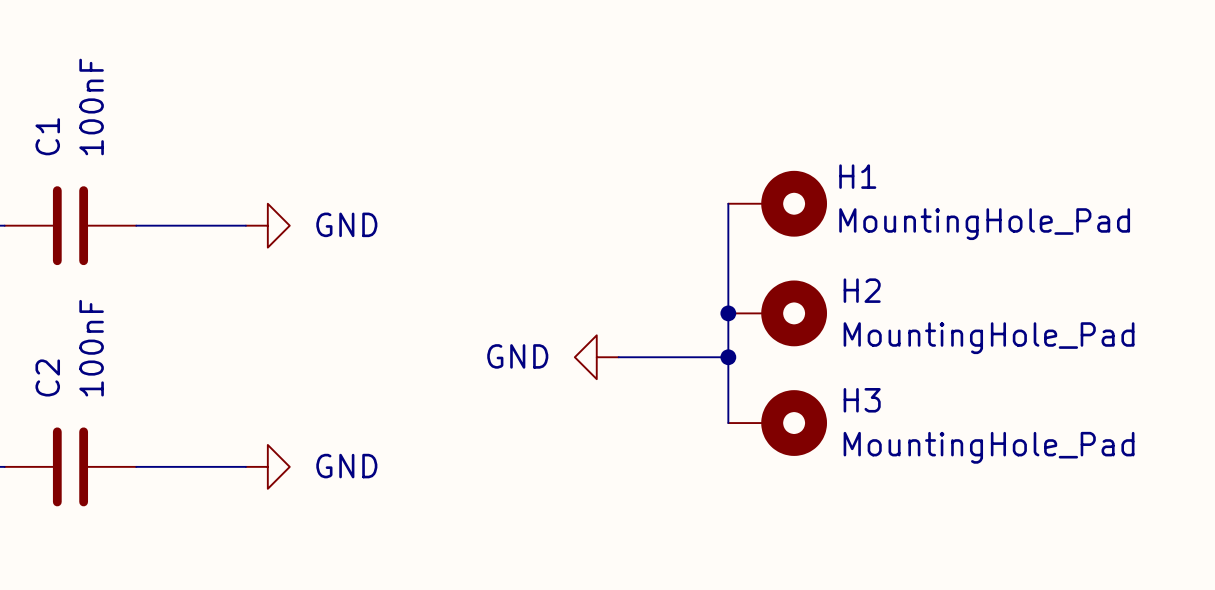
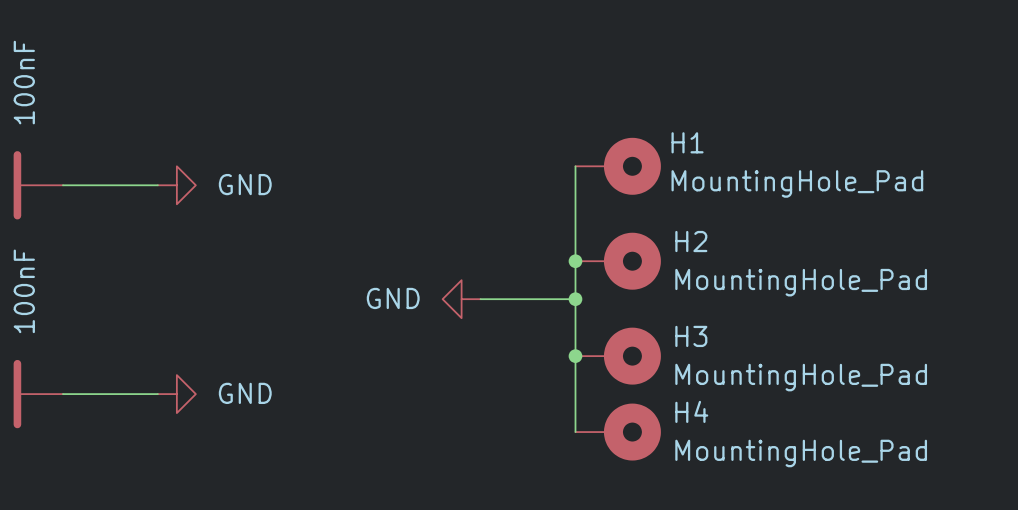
wire: none -> (575, 356) (575, 432)
junction: none -> (575, 356)
H4: none -> MountingHole_Pad (618, 432)

